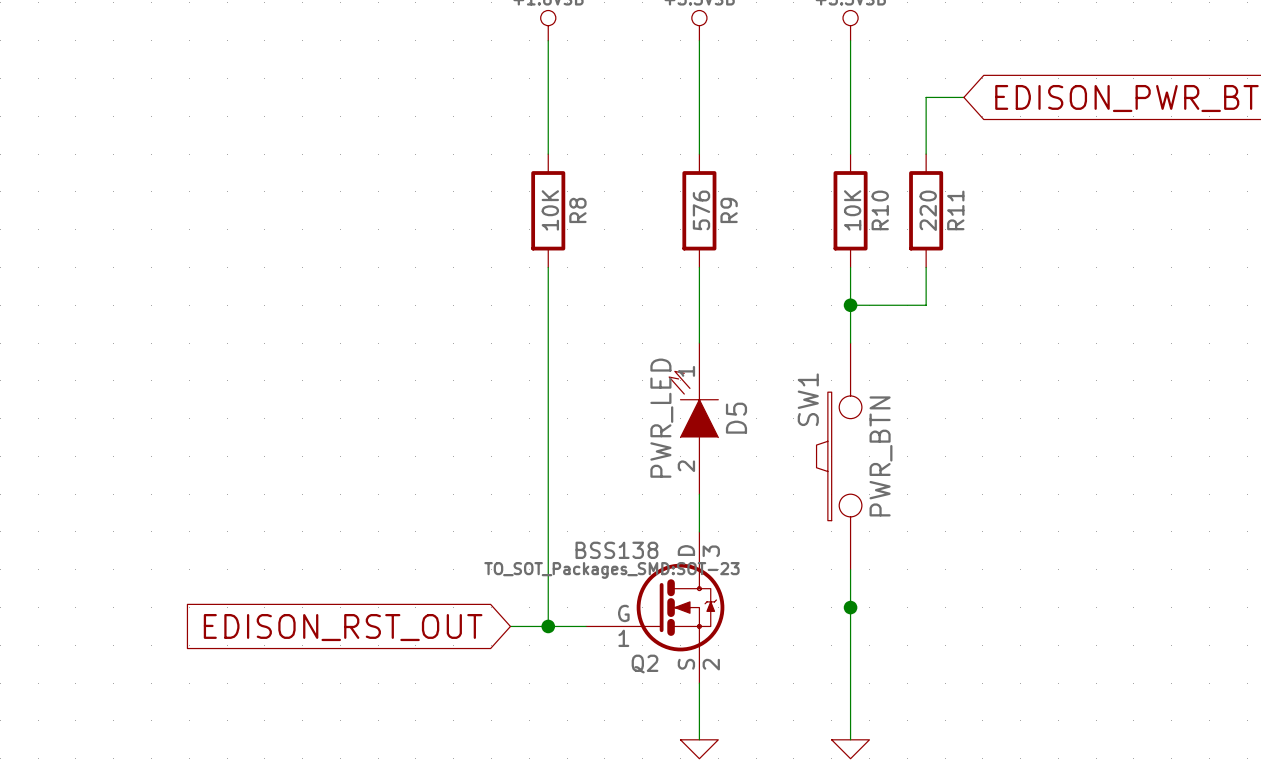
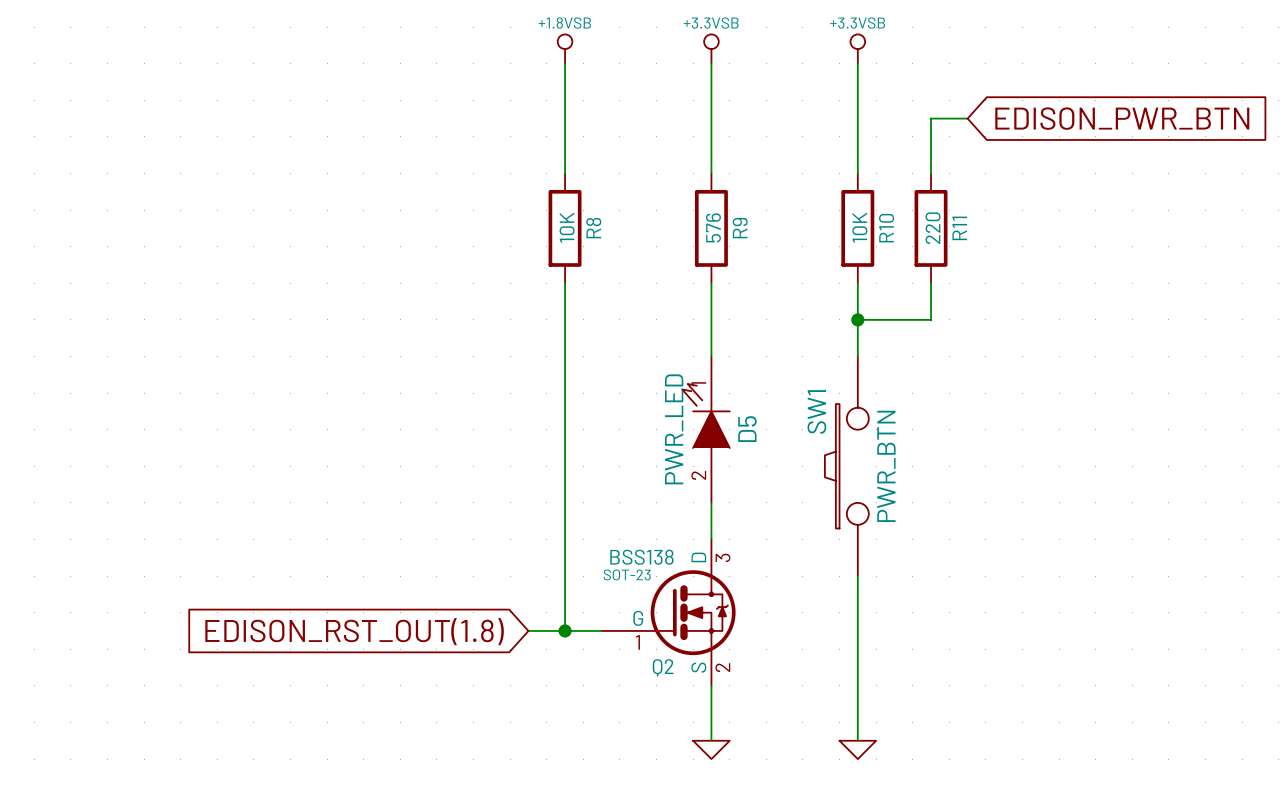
Q2 text: TO_SOT_Packages_SMD:SOT-23 (611, 570) -> SOT-23 (627, 574)
junction: (850, 607) -> none
global label: EDISON_RST_OUT (343, 627) -> EDISON_RST_OUT(1.8) (354, 631)

